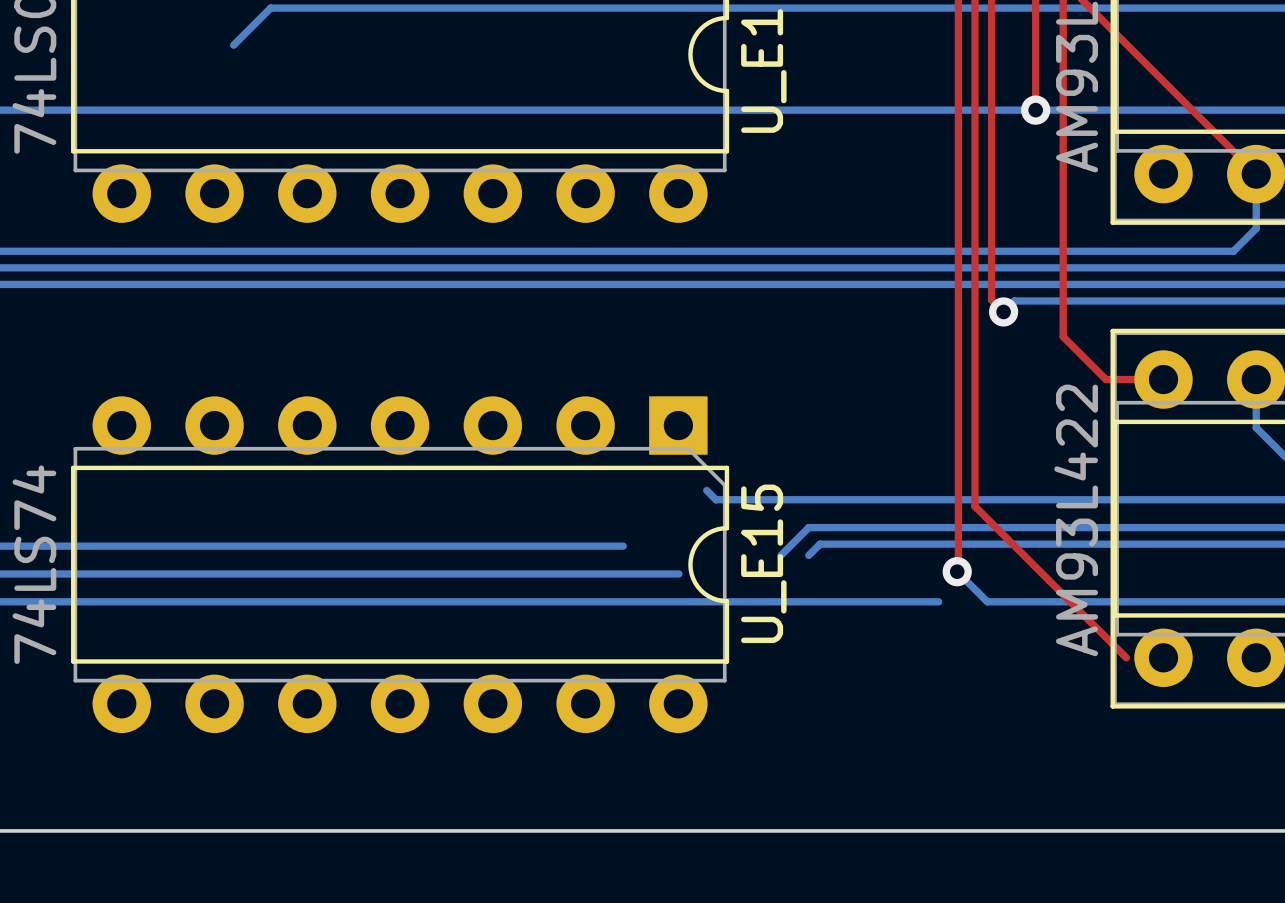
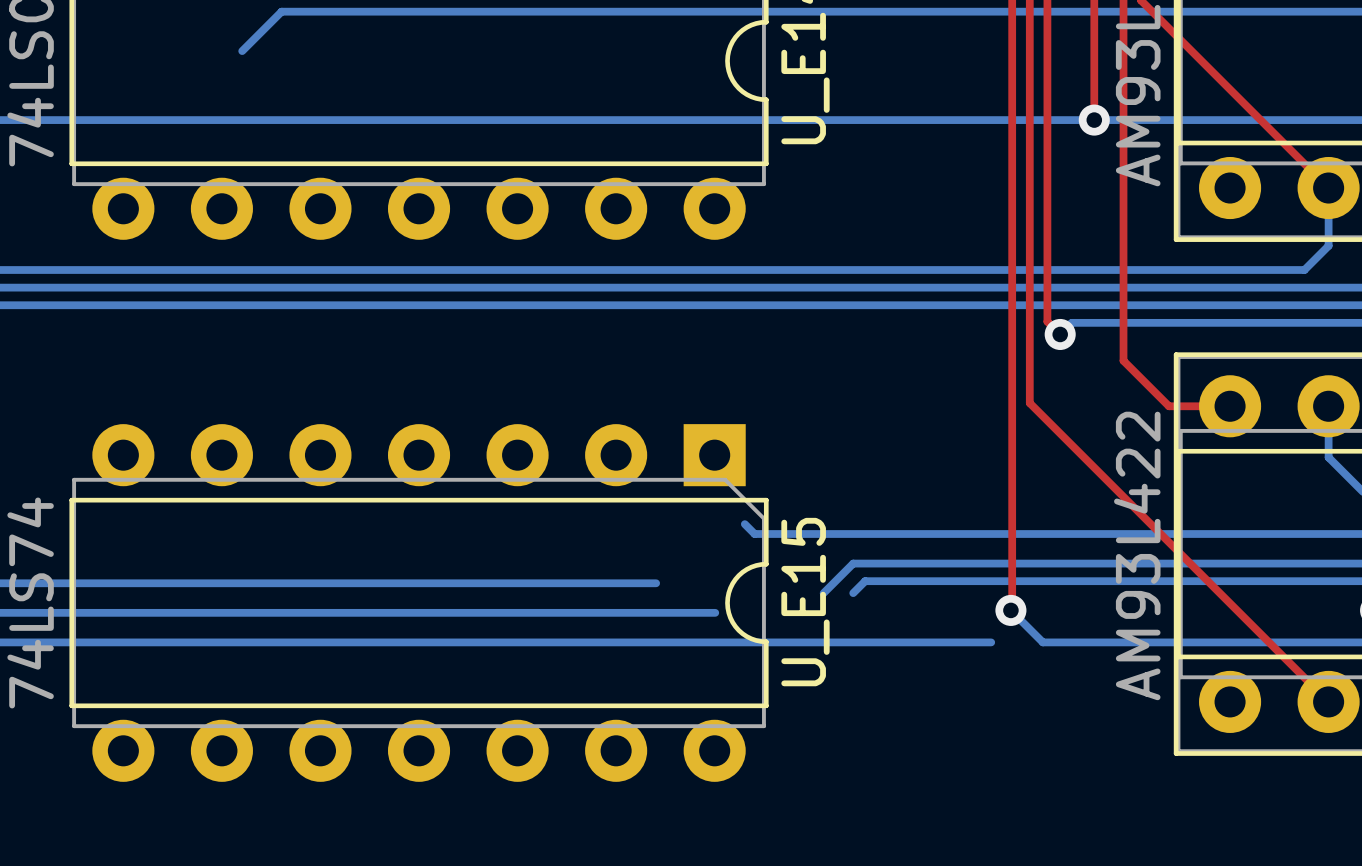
top track: (974, 376) (974, 506) (1126, 657) -> (1029, 403) (1328, 701)

